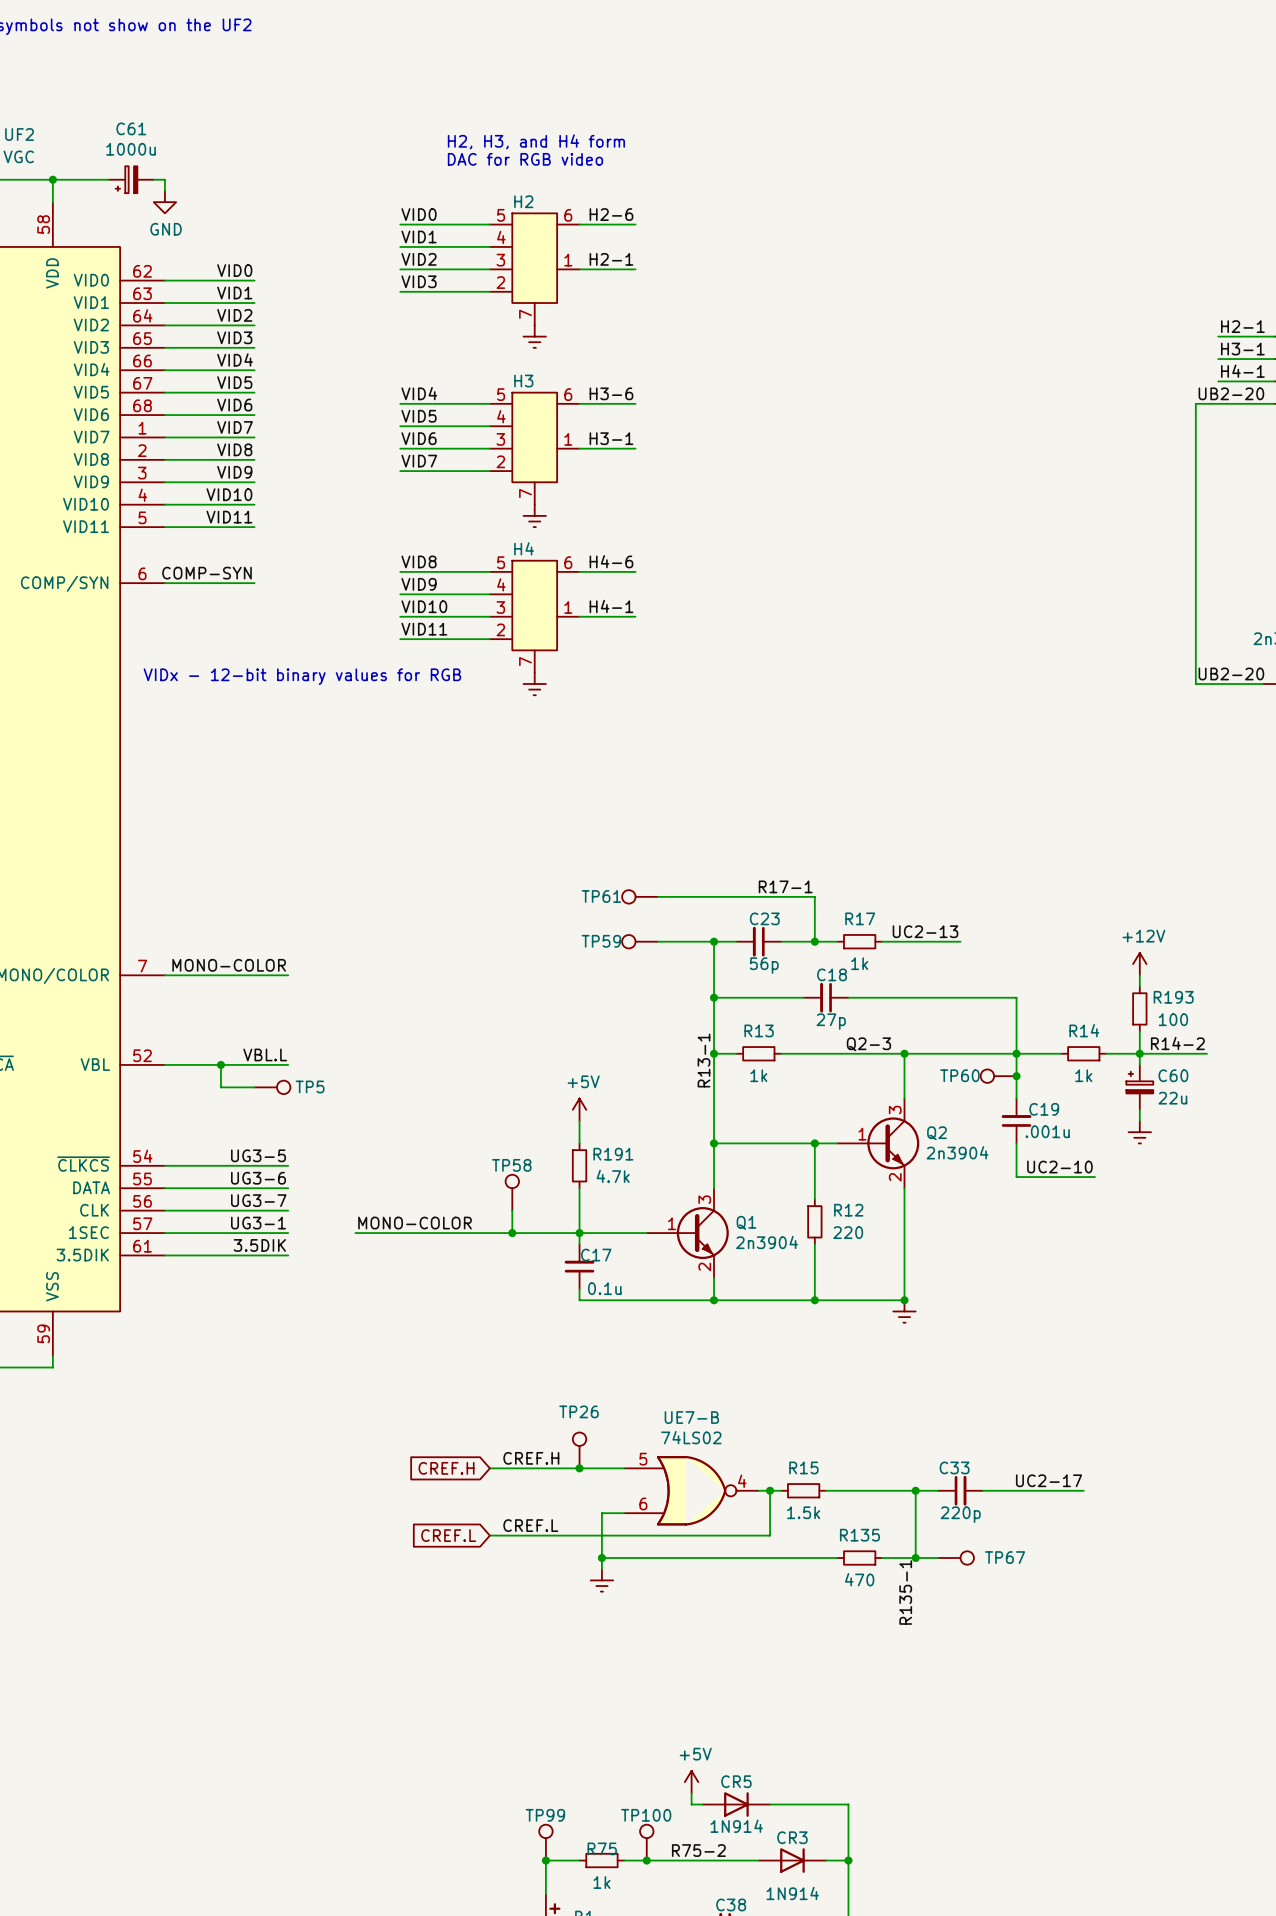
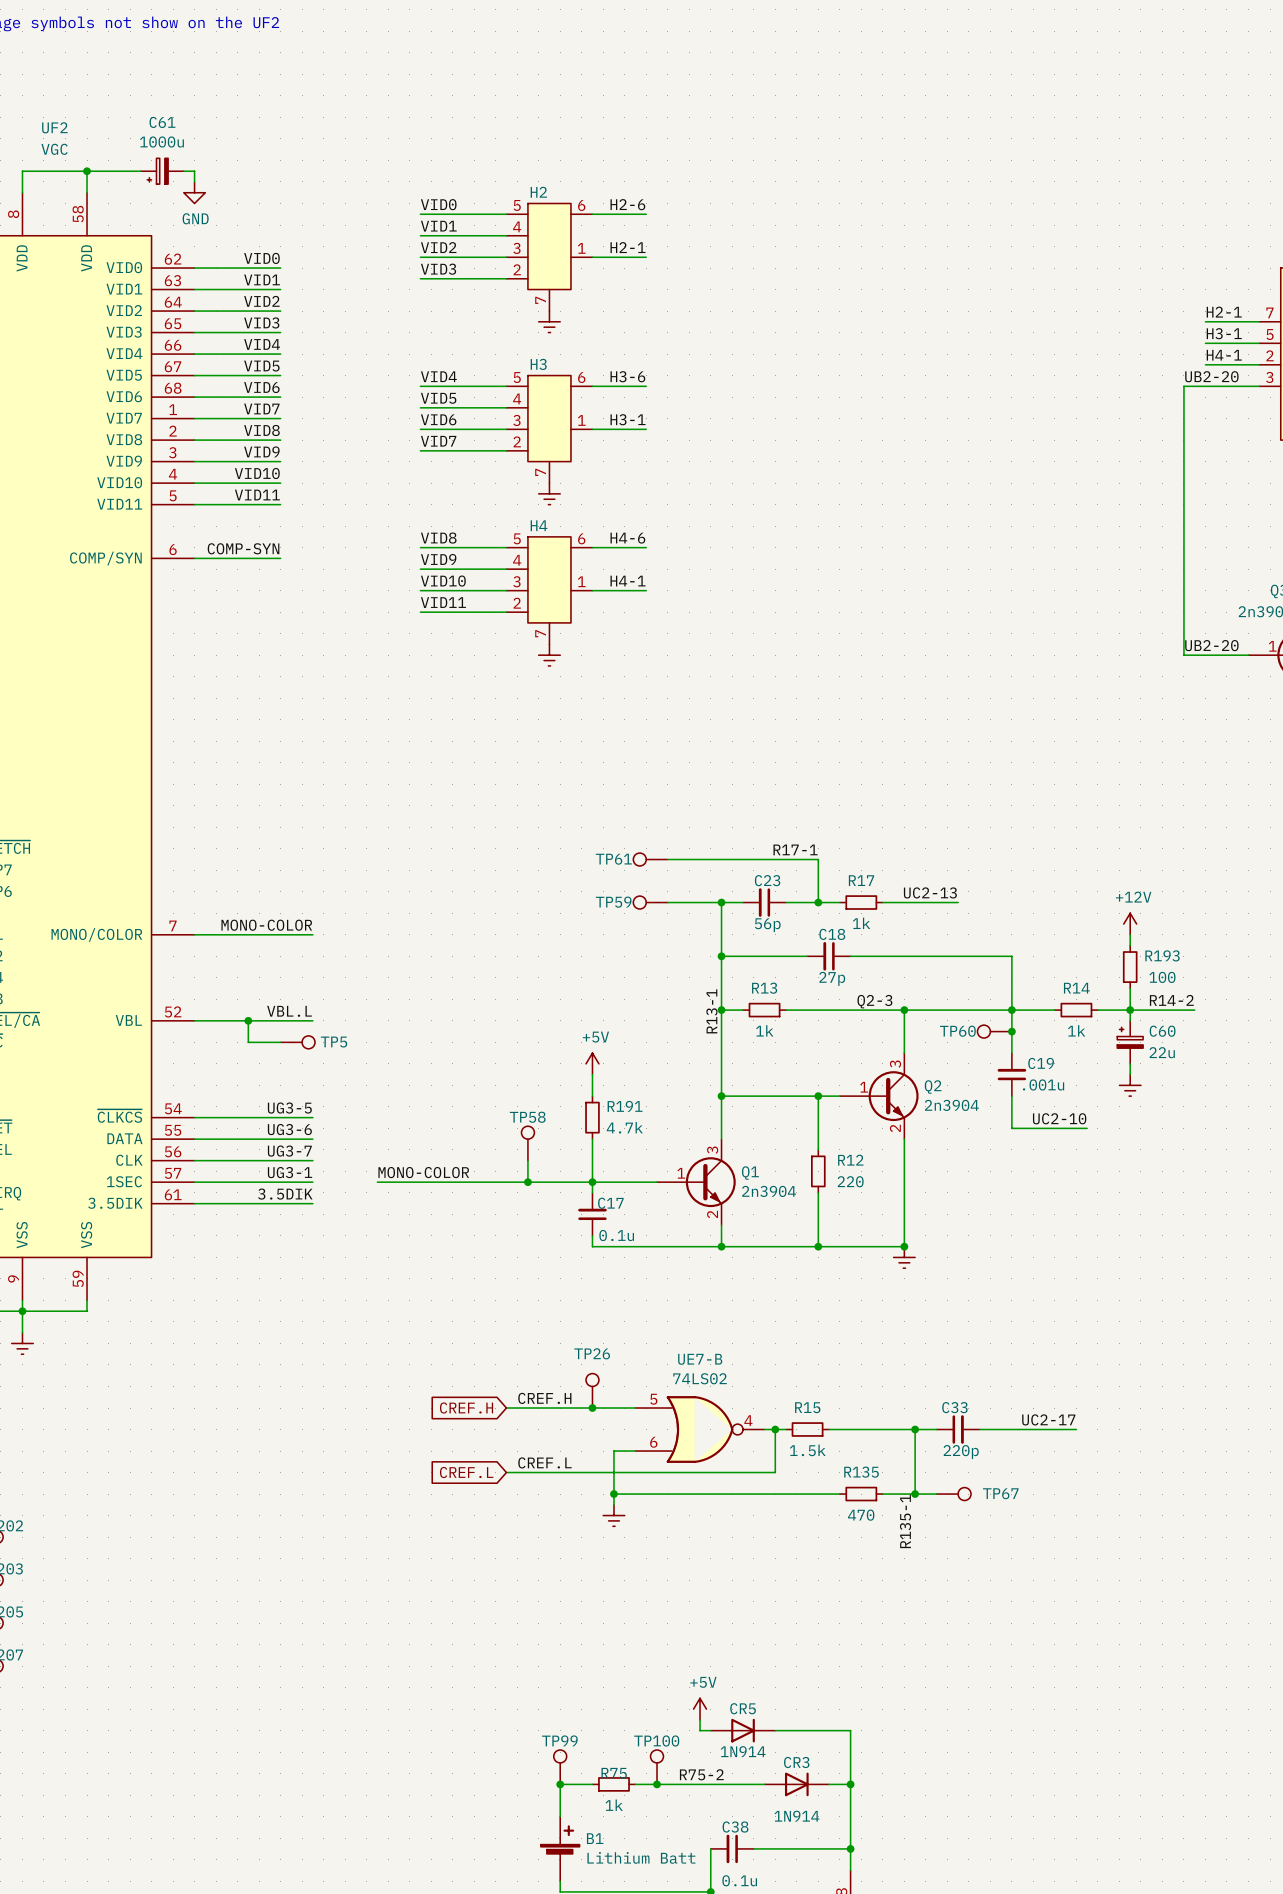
text: H2, H3, and H4 form (536, 141) -> none
text: DAC for RGB video (525, 159) -> none
text: VIDx - 12-bit binary values for RGB (302, 676) -> none

